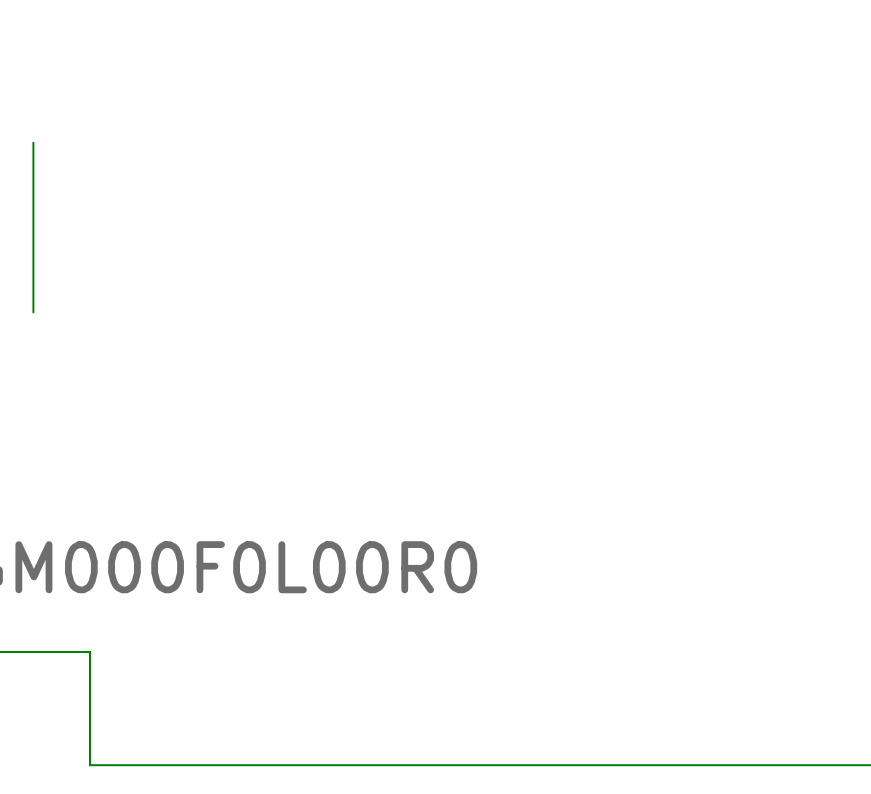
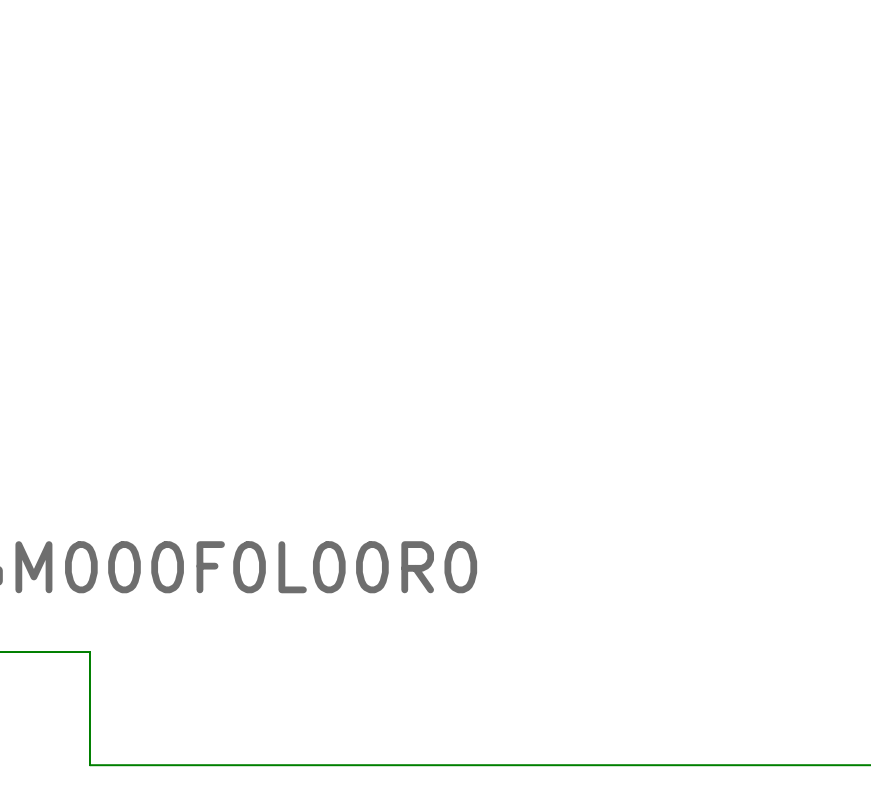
wire: (33, 142) (33, 312) -> none

